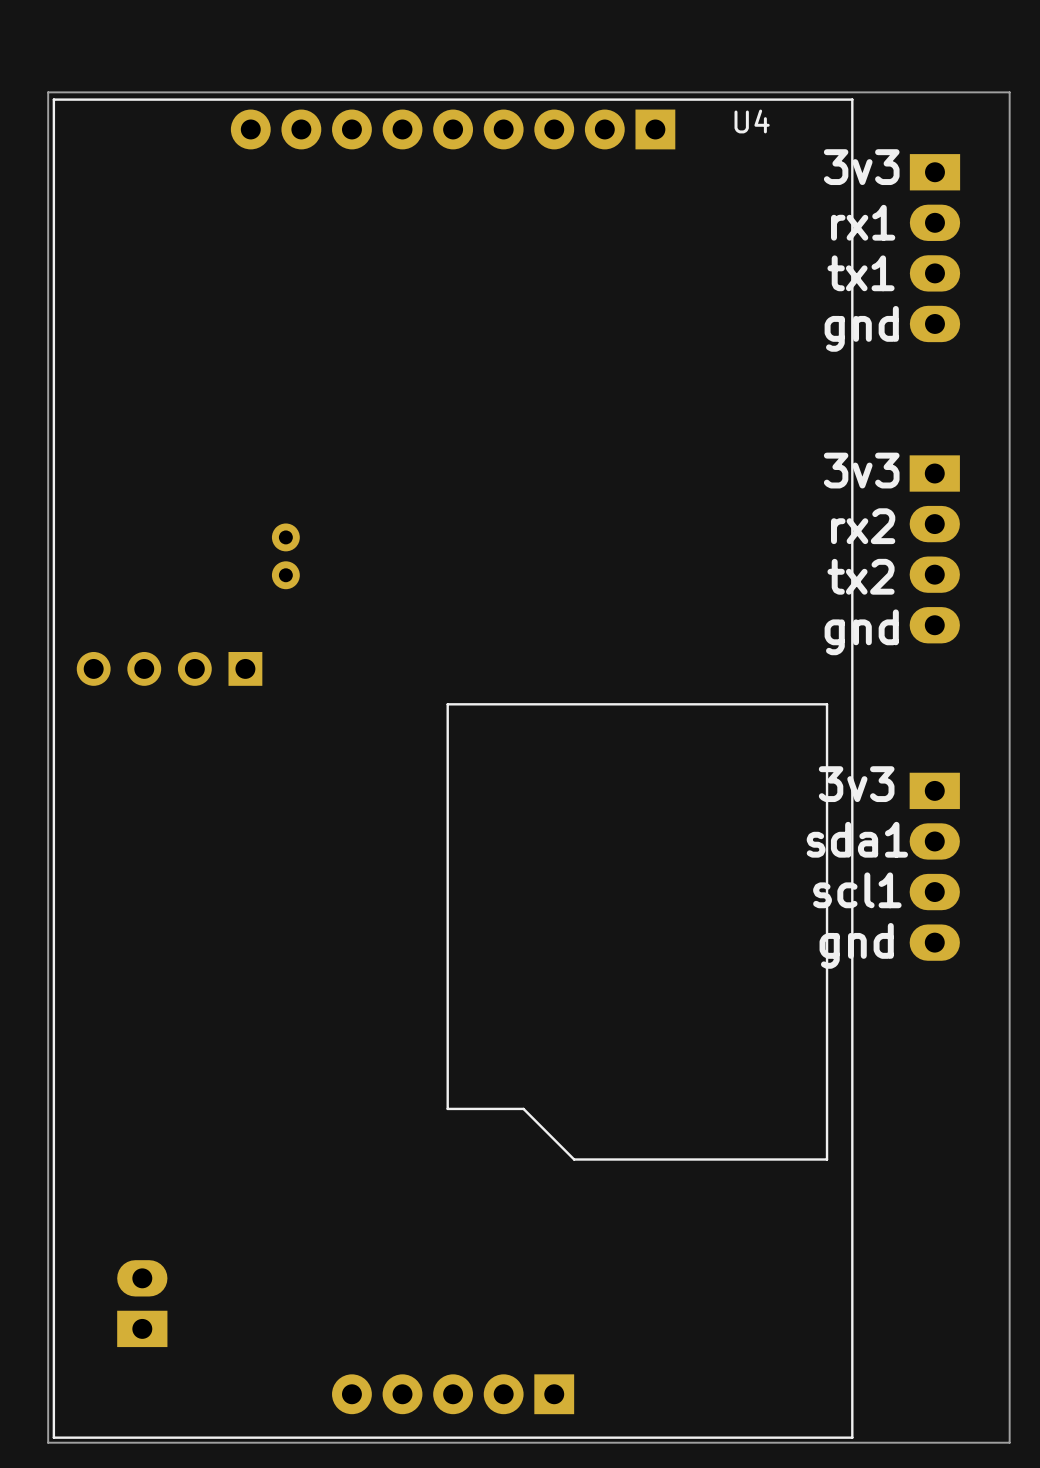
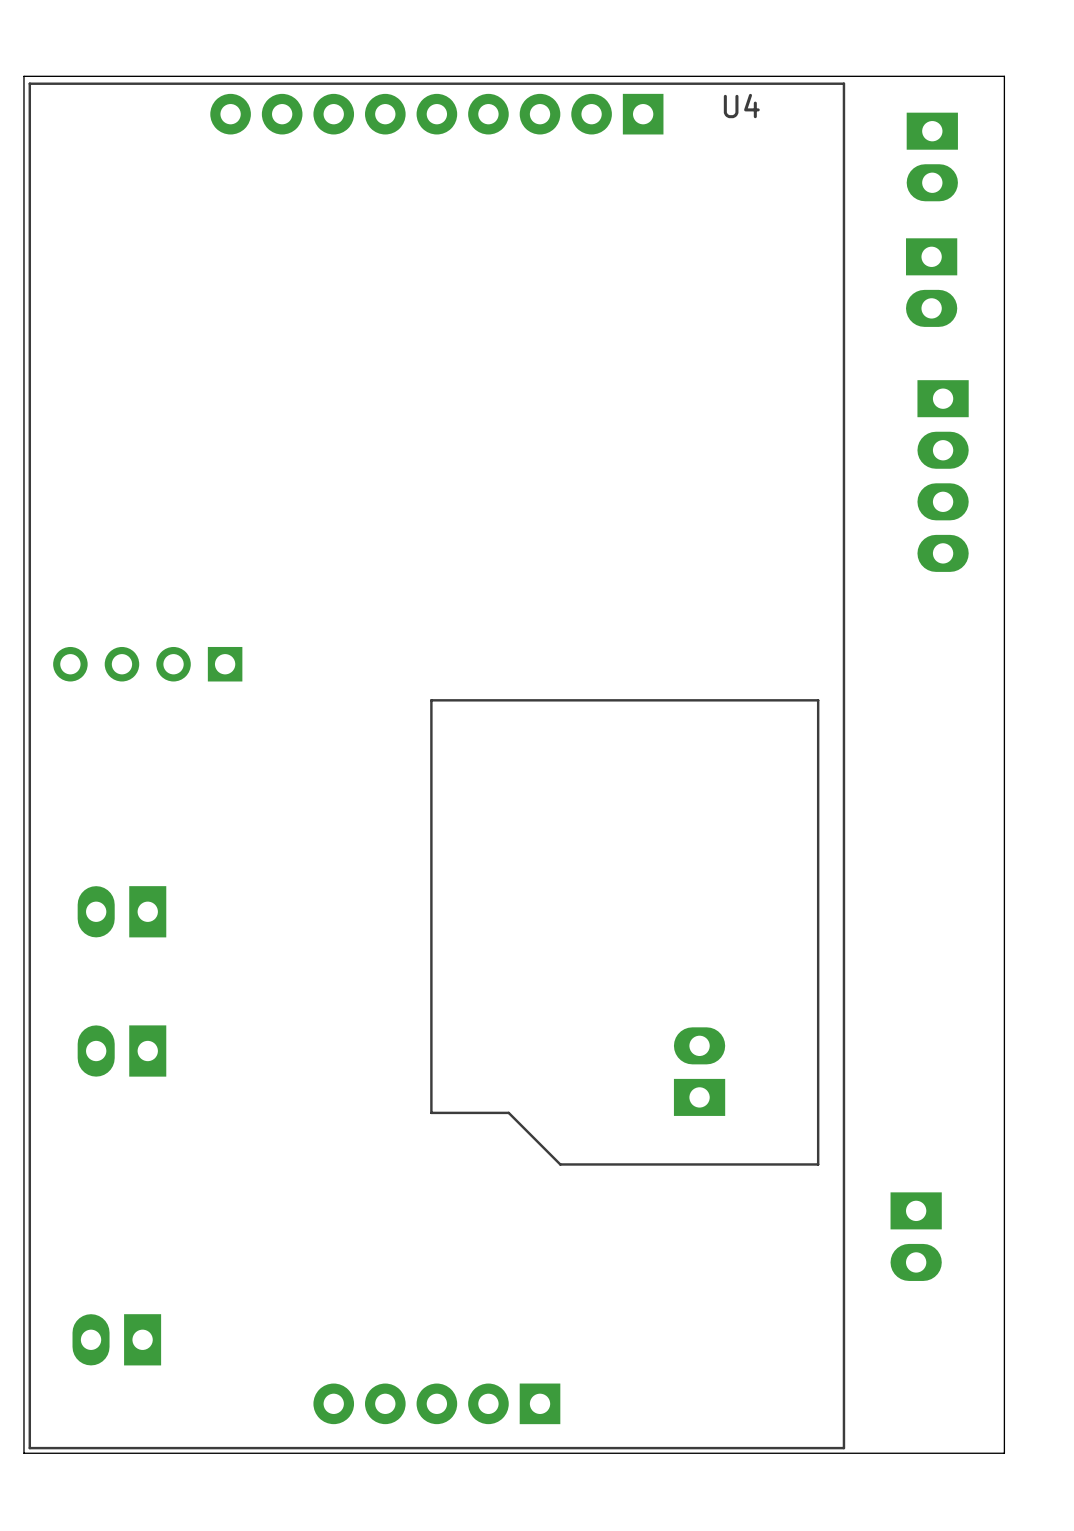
text: 3v3 (861, 167) -> none
part: none -> (932, 156)
text: rx1 (863, 222) -> none
part: (934, 248) -> none
text: tx1 (861, 273) -> none
part: none -> (931, 282)
text: gnd (861, 328) -> none
text: 3v3 (861, 470) -> none
text: rx2 (863, 526) -> none
part position: (934, 549) -> (943, 476)
part: (285, 556) -> none
text: tx2 (861, 576) -> none
text: gnd (861, 632) -> none
text: 3v3 (856, 784) -> none
text: sda1 (857, 839) -> none
part: (934, 866) -> none
text: scl1 (857, 890) -> none
part: none -> (121, 911)
text: gnd (856, 945) -> none
part: none -> (121, 1051)
part: none -> (699, 1071)
part: none -> (916, 1236)
part rotation: 0° (142, 1303) -> 90° counterclockwise (116, 1339)

